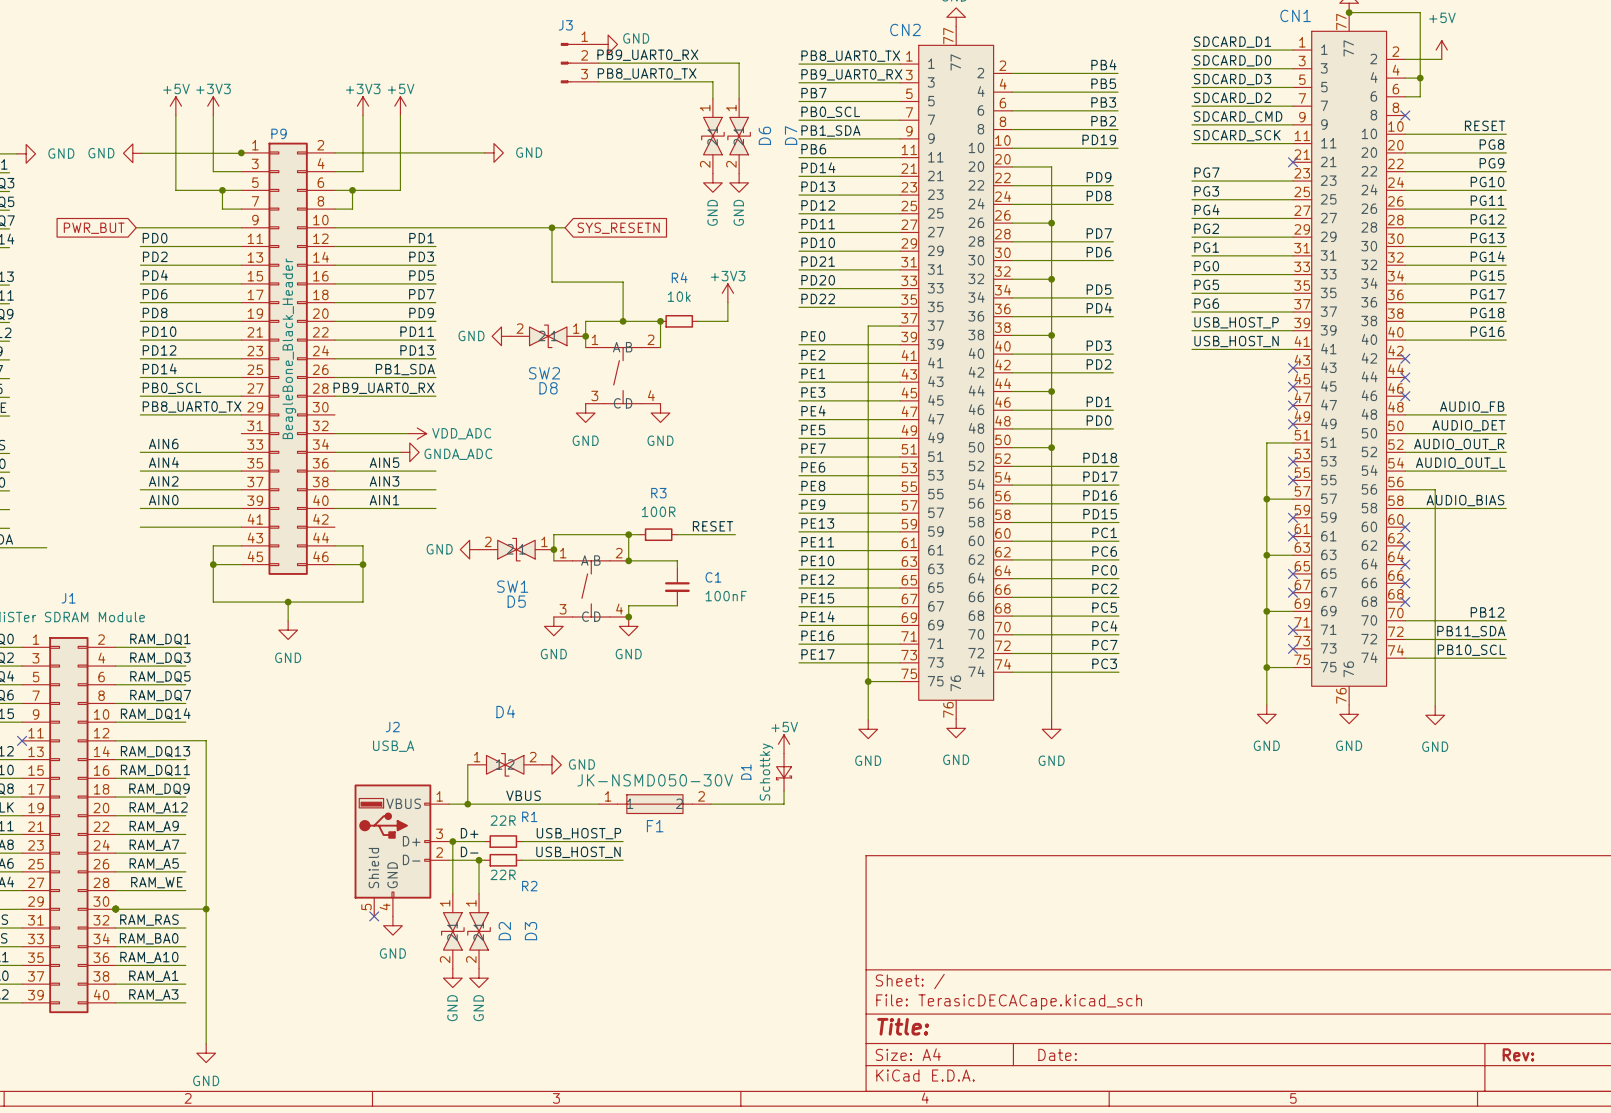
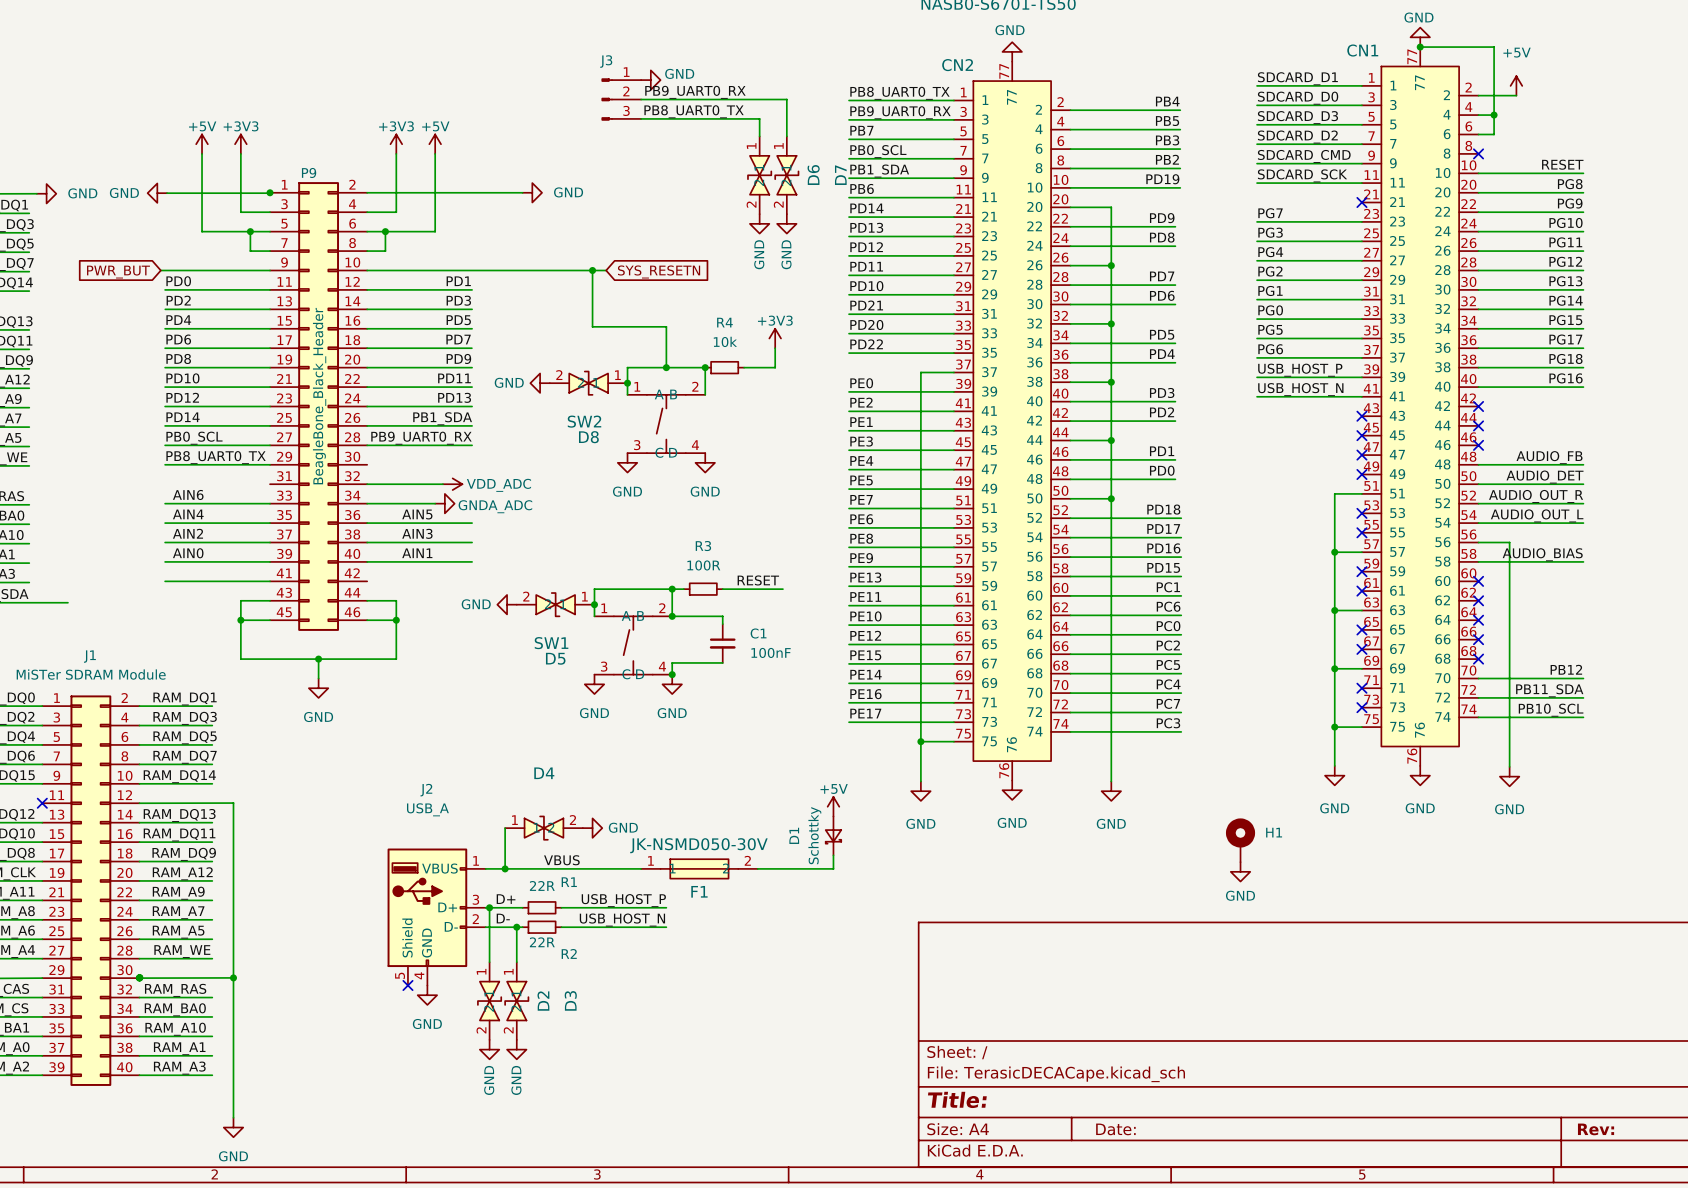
H1: none -> (1240, 840)
power symbol: none -> GND (1240, 871)

